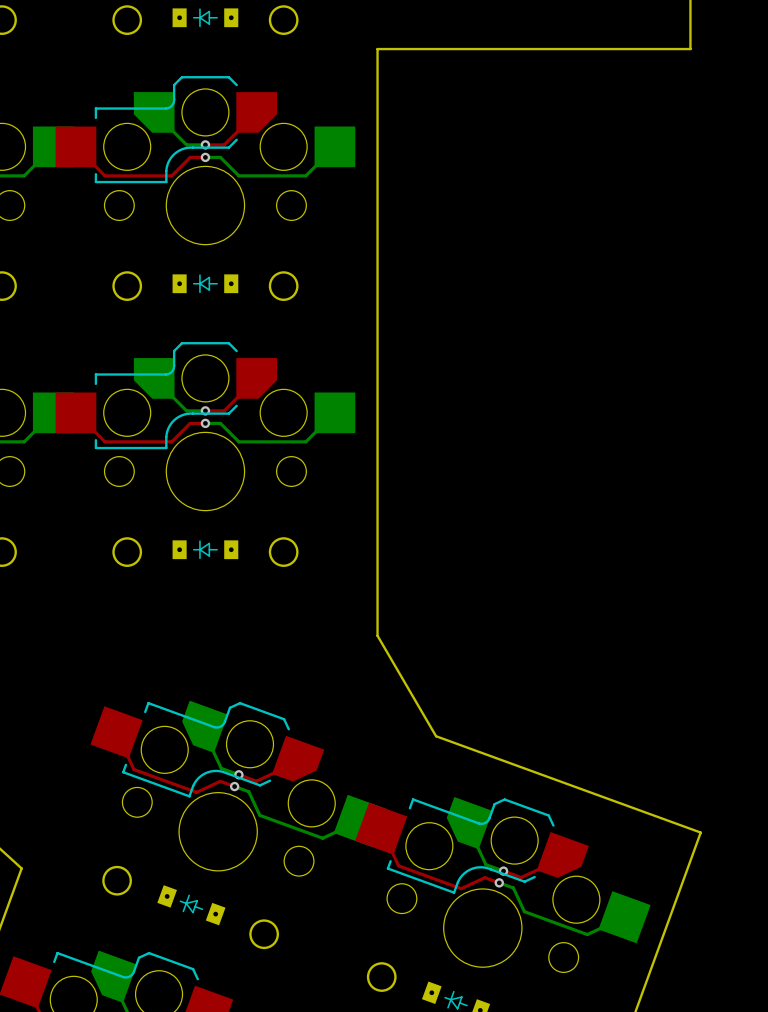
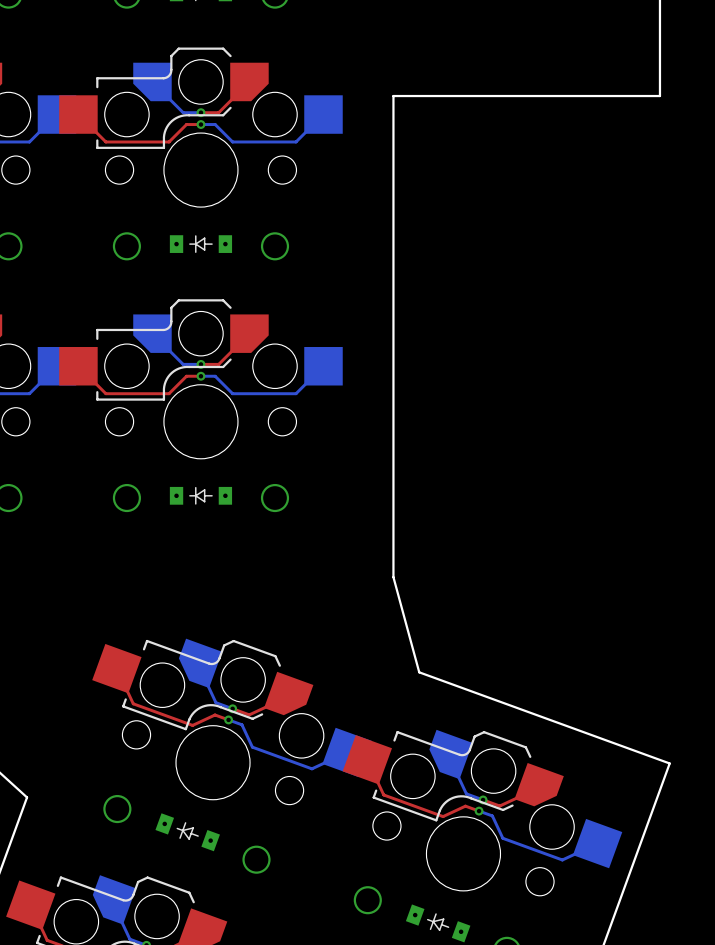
board edge: (690, 49) (377, 49) (377, 635) (436, 736) -> (659, 21) (659, 96) (393, 96) (393, 577) (419, 672)

